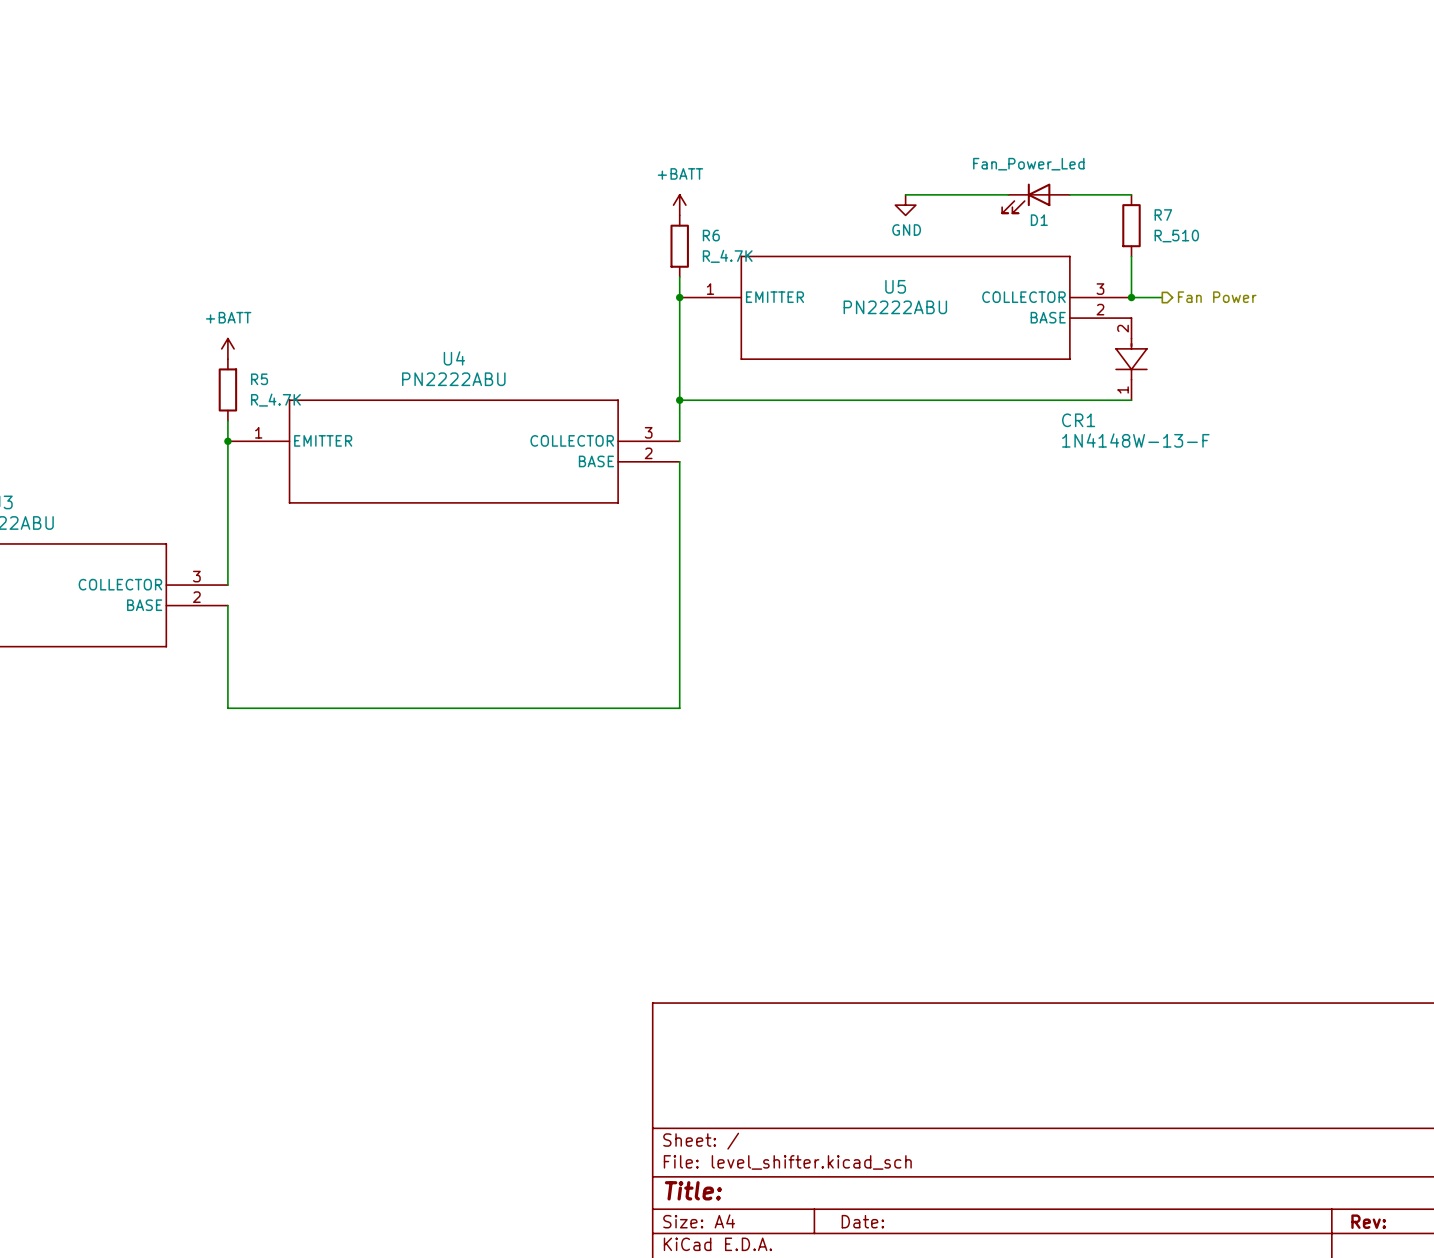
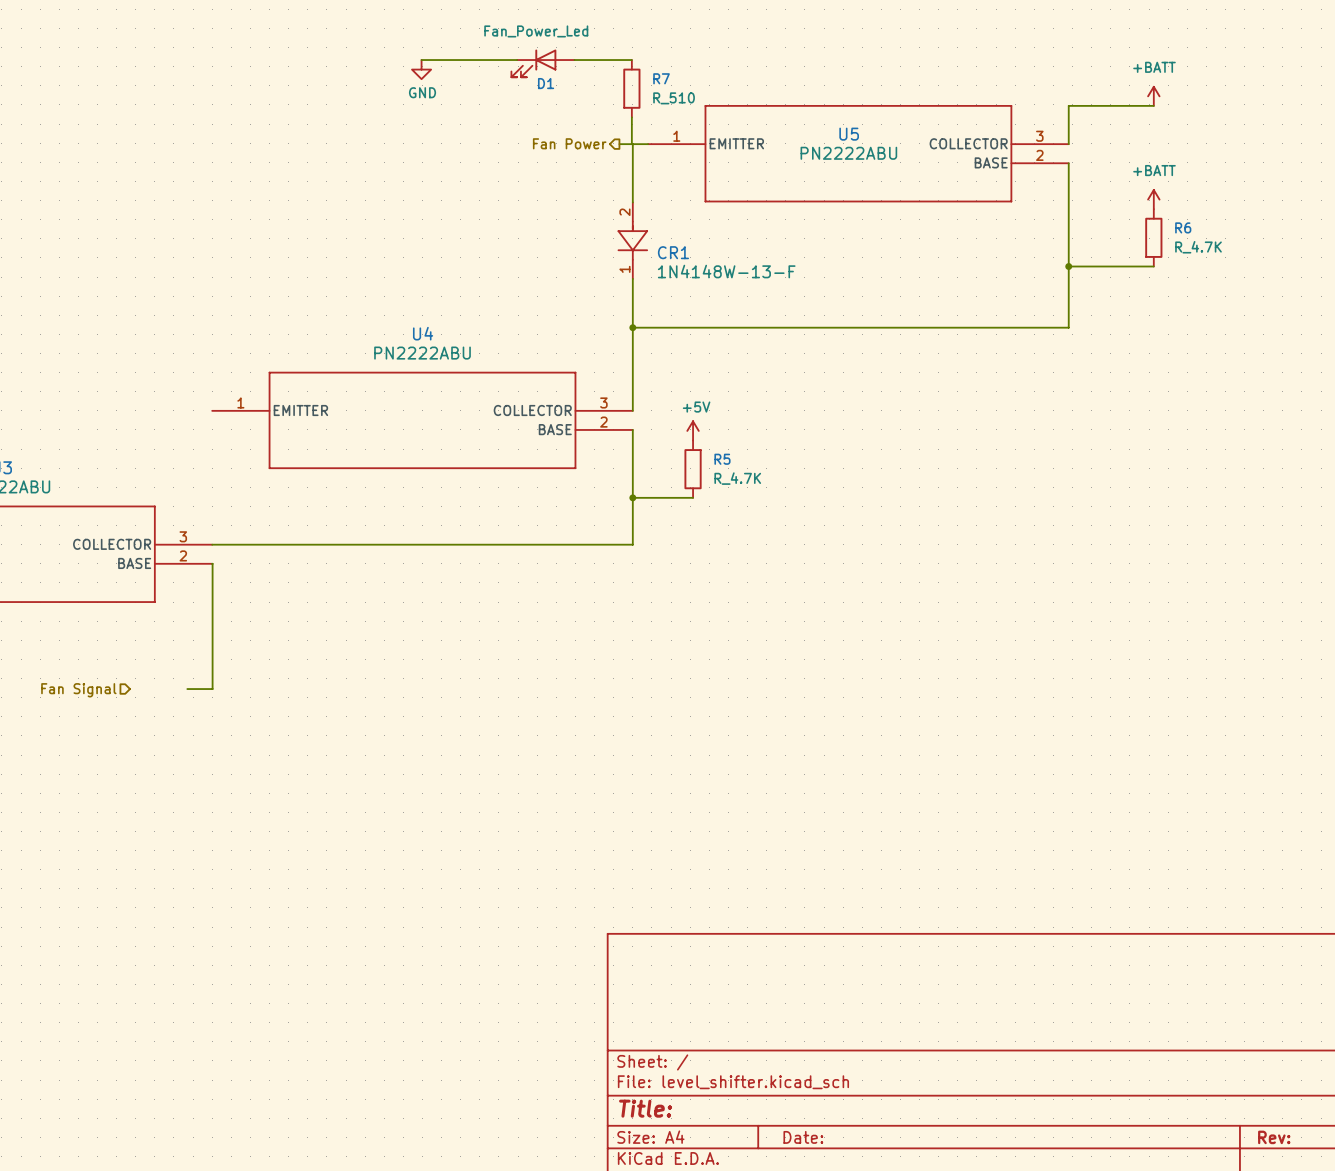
wire: none -> (421, 60) (517, 60)
wire: none -> (574, 60) (631, 60)
power symbol: none -> GND (421, 69)
power symbol: none -> +BATT (1153, 96)
wire: none -> (1153, 105) (1068, 105) (1068, 144)
wire: none -> (631, 117) (631, 144)
hierarchical label: none -> Fan Power (569, 143)
wire: none -> (619, 144) (648, 144)
wire: none -> (632, 144) (632, 202)
wire: none -> (1068, 163) (1068, 327) (632, 327)
wire: (905, 194) (1008, 194) -> none
wire: (1069, 194) (1131, 194) -> none
D1 position: (1036, 198) -> (542, 63)
power symbol: +BATT (679, 205) -> none
power symbol: GND (905, 205) -> none
power symbol: none -> +BATT (1153, 199)
R7 position: (1131, 225) -> (631, 88)
R6 position: (679, 246) -> (1153, 237)
wire: (1131, 256) (1131, 297) (1162, 297) -> none
wire: none -> (1068, 266) (1153, 266)
junction: (679, 297) -> none
junction position: (1131, 297) -> (1068, 266)
hierarchical label: Fan Power (1217, 297) -> none
U5 position: (905, 307) -> (858, 153)
power symbol: +BATT (227, 348) -> none
junction: none -> (632, 327)
CR1 position: (1131, 359) -> (632, 240)
R5 position: (227, 389) -> (693, 469)
wire: (679, 400) (1131, 400) -> none
junction: (679, 400) -> none
wire: (227, 420) (227, 585) -> none
CR1 name position: CR1 (1078, 420) -> CR1 (673, 252)
CR1 value position: 1N4148W-13-F (1135, 440) -> 1N4148W-13-F (726, 271)
junction: (227, 441) -> none
power symbol: none -> +5V (693, 430)
wire: none -> (632, 497) (693, 497)
junction: none -> (632, 497)
wire: (679, 585) (679, 708) (227, 708) (227, 605) -> (632, 544) (212, 544)
wire: none -> (212, 563) (212, 689) (187, 689)
hierarchical label: none -> Fan Signal (78, 690)

